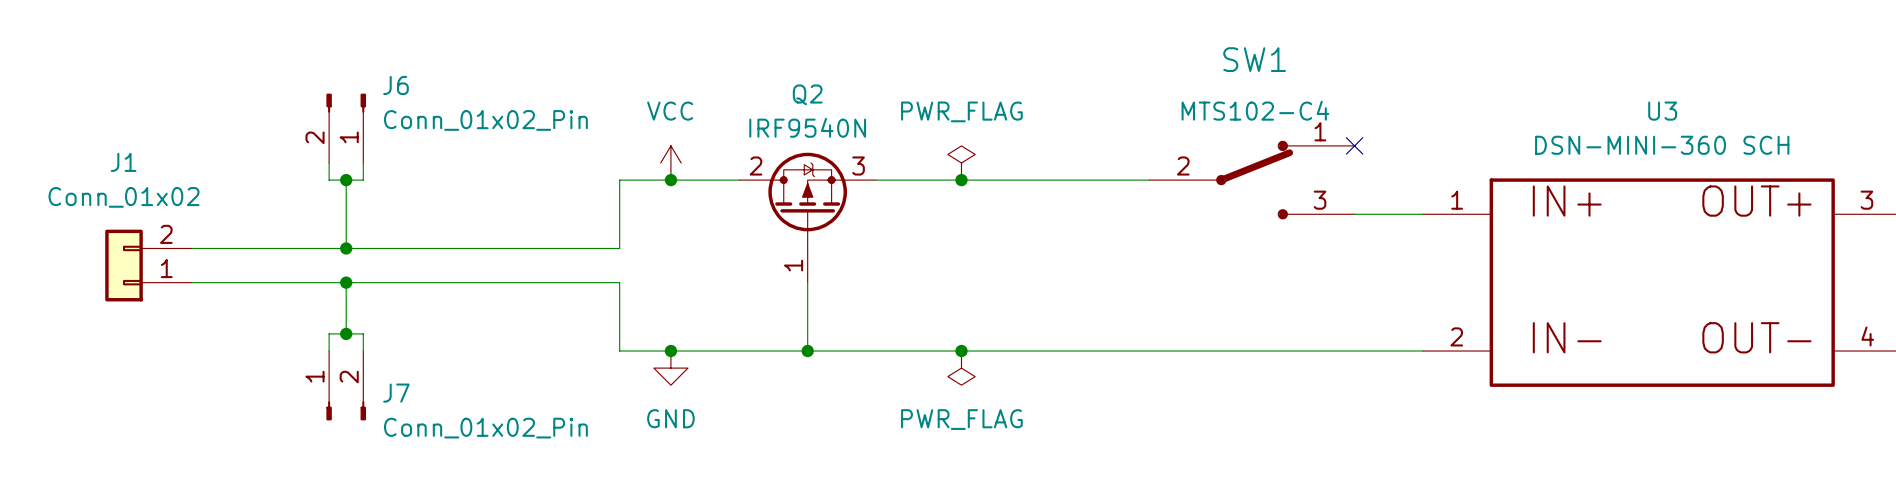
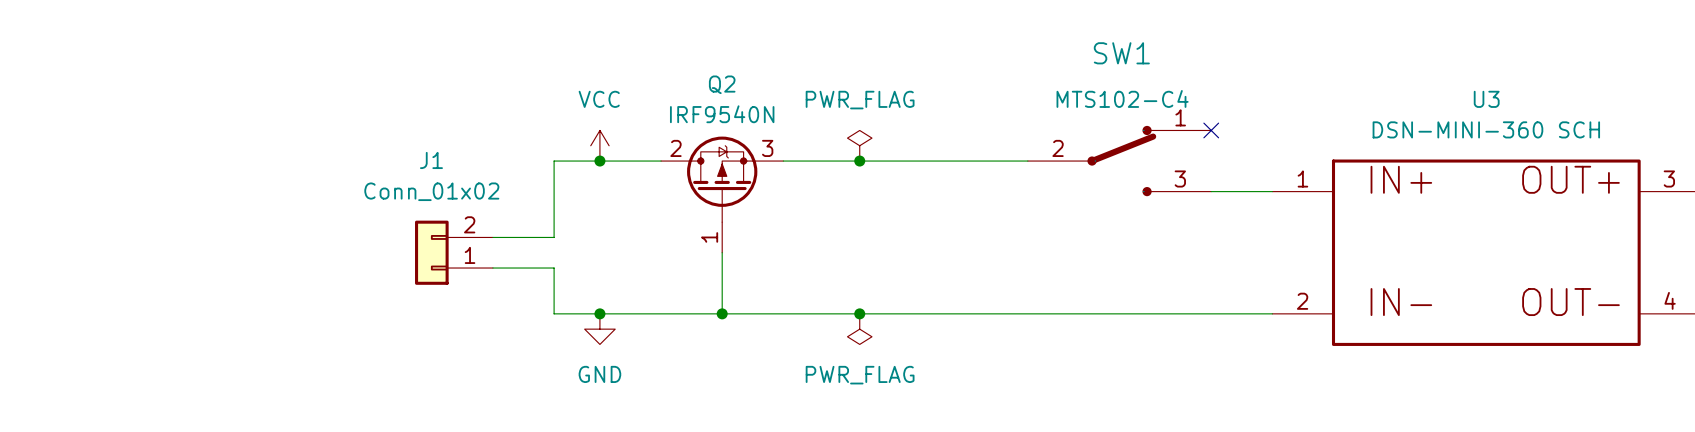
J6: Conn_01x02_Pin (346, 128) -> none
wire: (329, 163) (329, 180) (363, 180) (363, 163) -> none
wire: (346, 180) (346, 248) -> none
junction: (346, 180) -> none
wire: (192, 248) (619, 248) -> (492, 237) (554, 237) (554, 222)
junction: (346, 248) -> none
J1 position: (148, 265) -> (453, 252)
wire: (192, 282) (619, 282) (619, 299) -> (492, 268) (554, 268)
wire: (346, 282) (346, 333) -> none
junction: (346, 282) -> none
junction: (346, 333) -> none
wire: (329, 351) (329, 333) (363, 333) (363, 351) -> none
J7: Conn_01x02_Pin (346, 385) -> none

